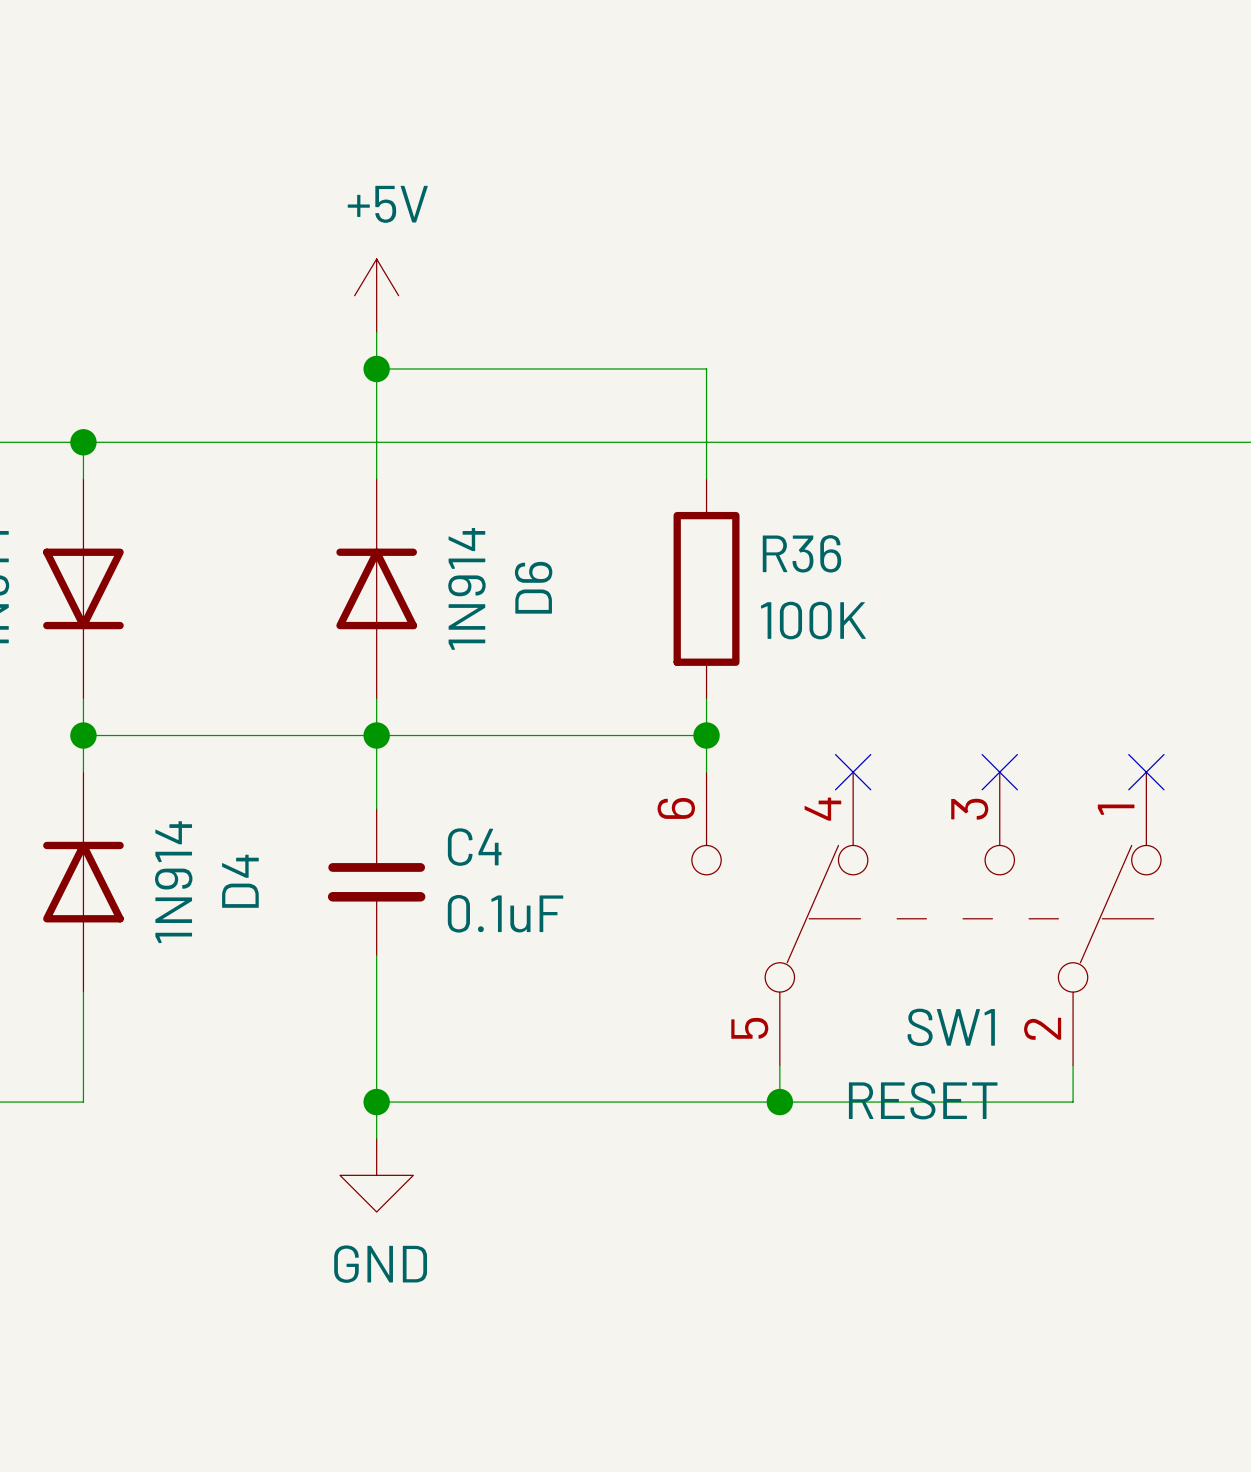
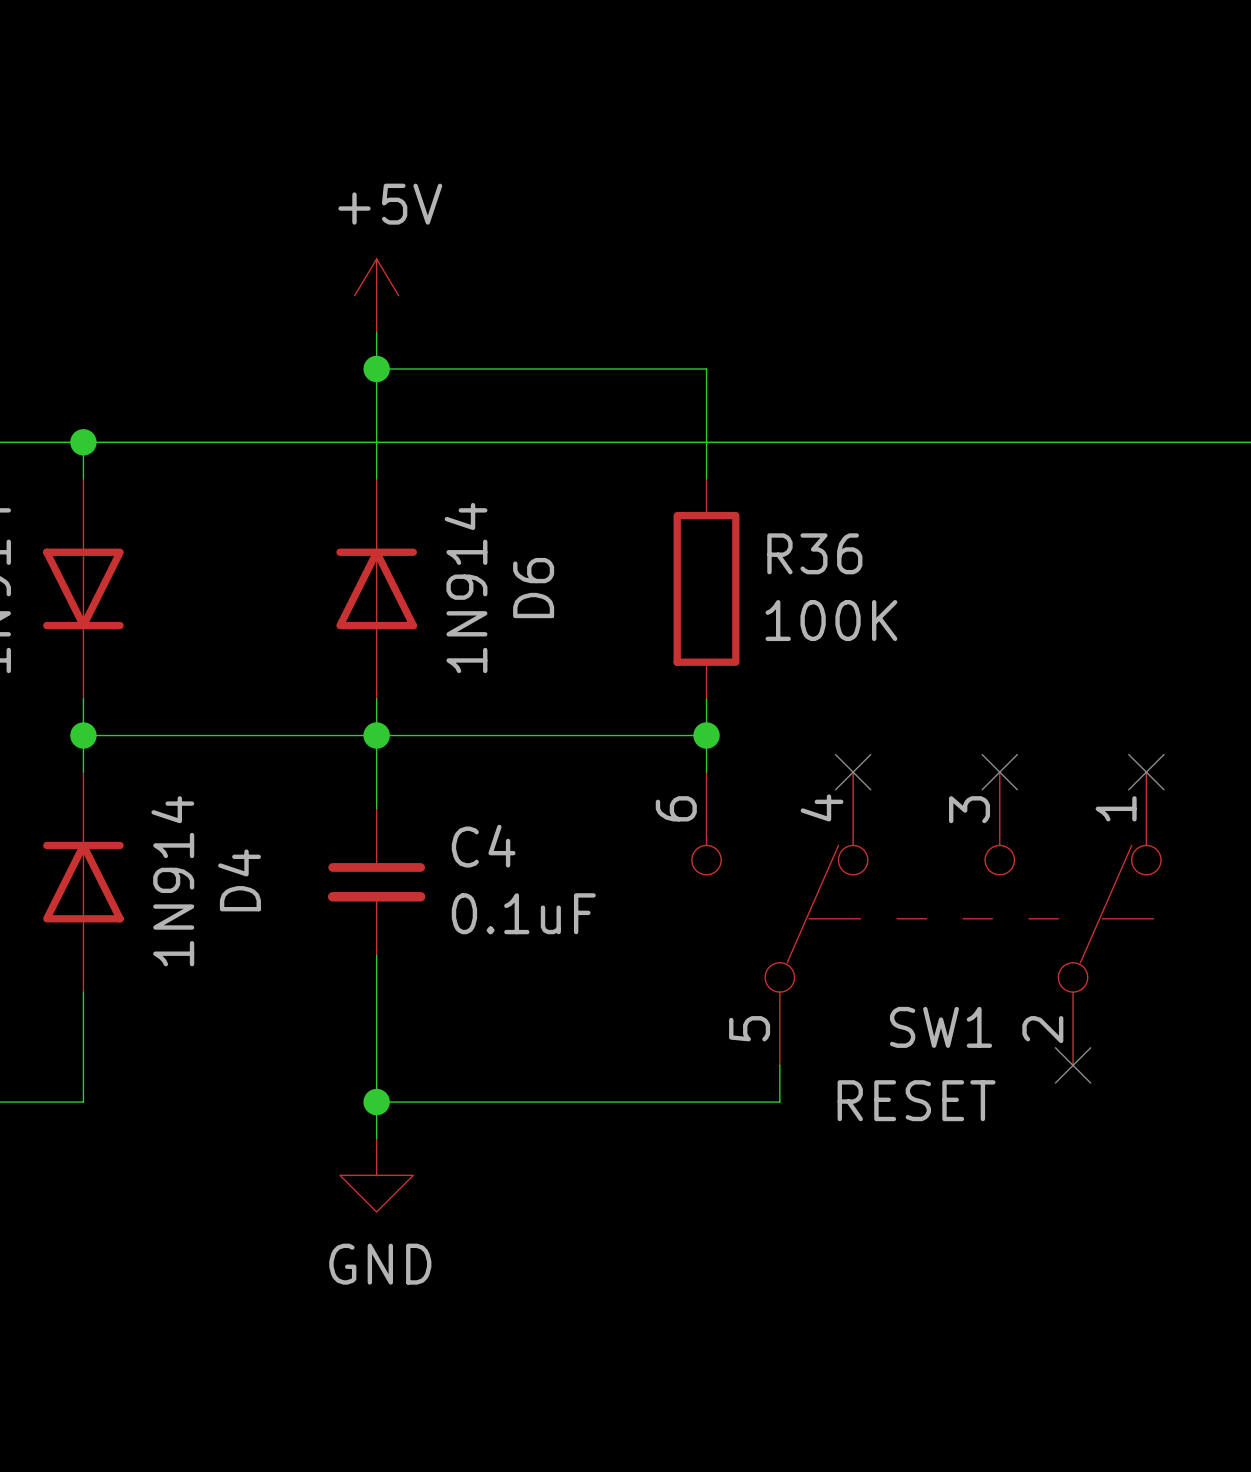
wire: (1073, 1065) (1073, 1102) (779, 1102) -> none
no-connect mark: none -> (1073, 1065)
junction: (779, 1102) -> none

